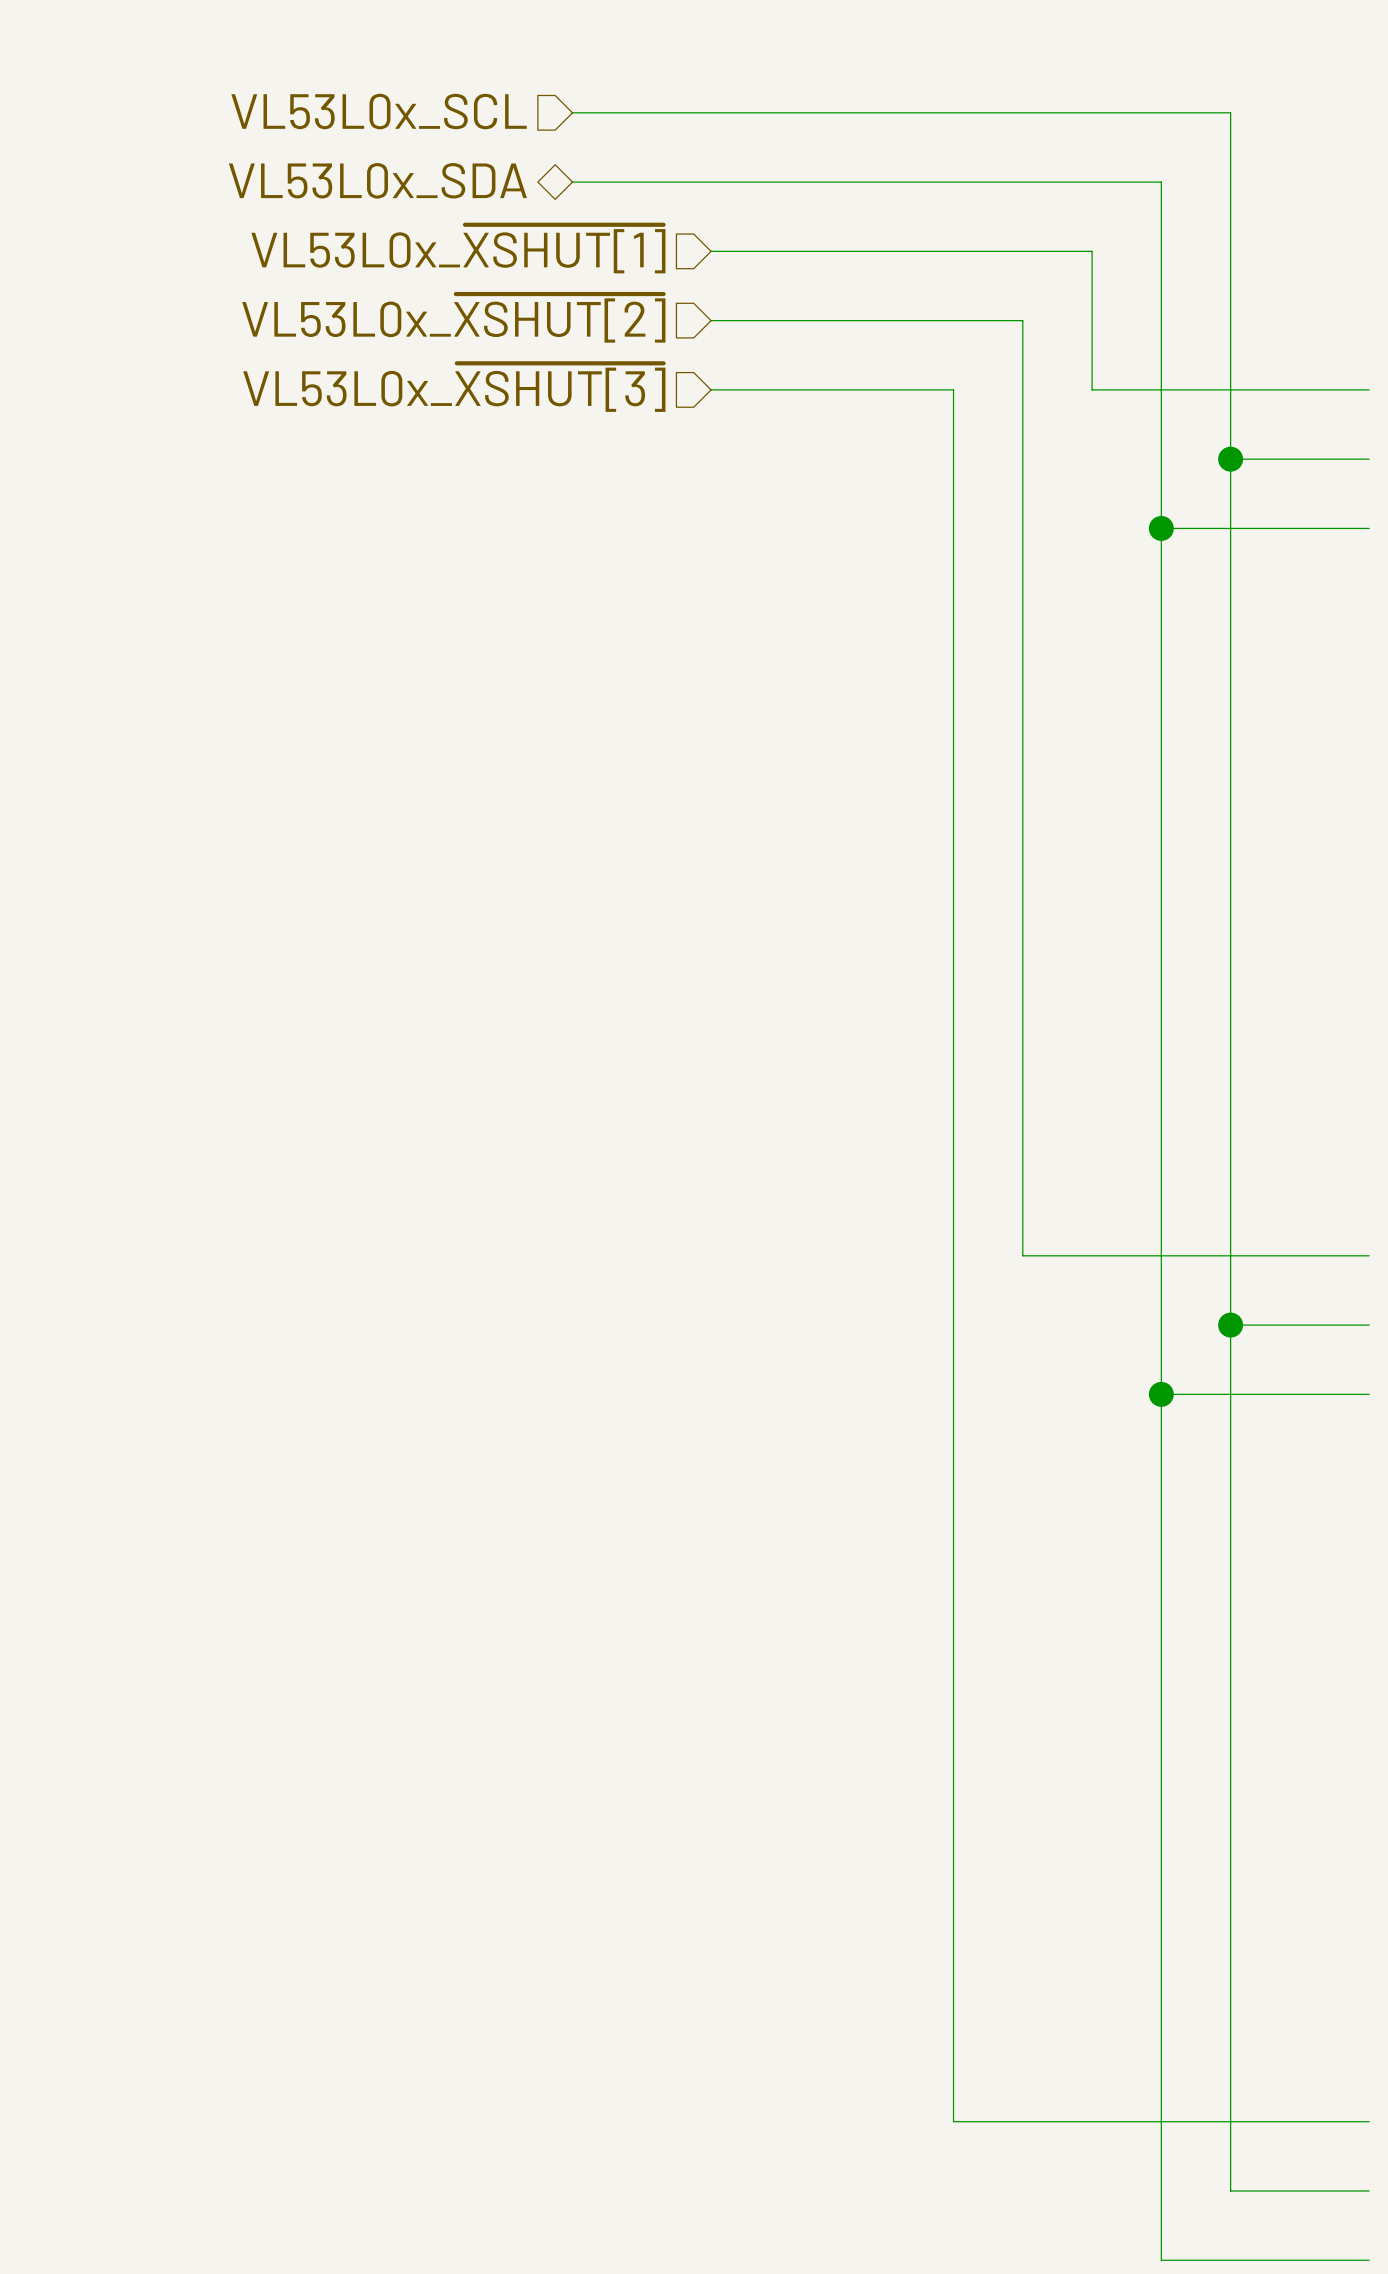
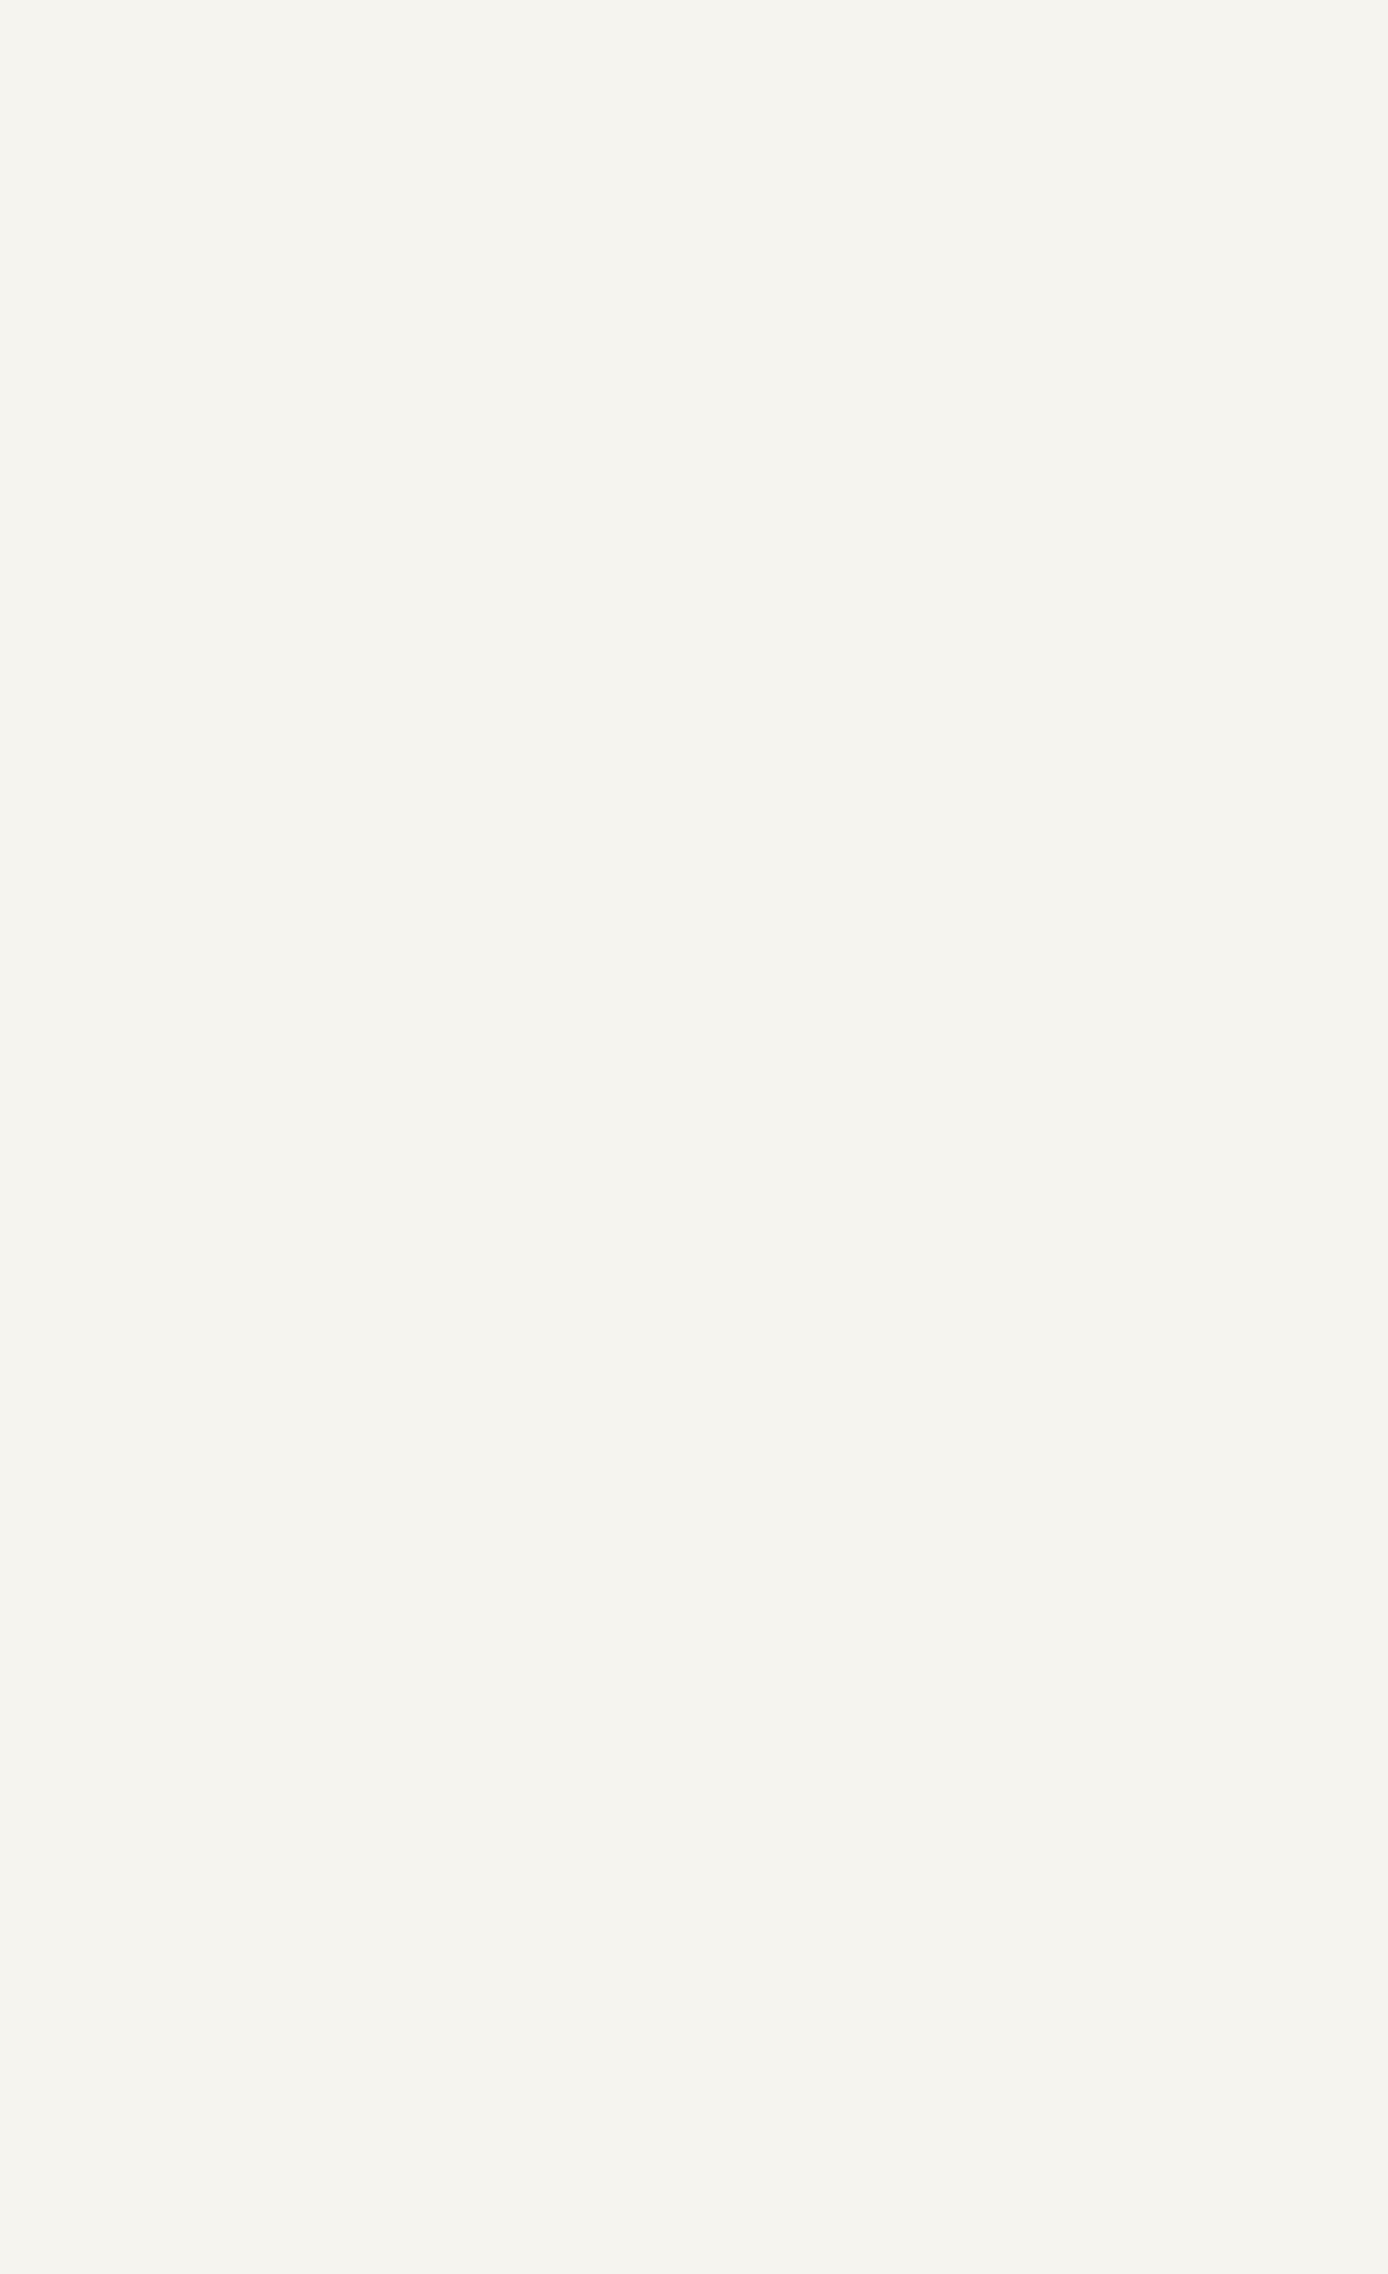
hierarchical label: VL53L0x_SCL (379, 111) -> none
wire: (572, 112) (1230, 112) (1230, 2190) (1369, 2190) -> none
hierarchical label: VL53L0x_SDA (377, 180) -> none
wire: (572, 182) (1161, 182) (1161, 2260) (1369, 2260) -> none
hierarchical label: VL53L0x_~{XSHUT[1]} (458, 249) -> none
wire: (711, 251) (1092, 251) (1092, 389) (1369, 389) -> none
hierarchical label: VL53L0x_~{XSHUT[2]} (453, 318) -> none
wire: (711, 320) (1022, 320) (1022, 1255) (1369, 1255) -> none
hierarchical label: VL53L0x_~{XSHUT[3]} (454, 387) -> none
wire: (711, 389) (953, 389) (953, 2121) (1369, 2121) -> none
wire: (1230, 459) (1369, 459) -> none
junction: (1230, 459) -> none
wire: (1161, 528) (1369, 528) -> none
junction: (1161, 528) -> none
wire: (1230, 1325) (1369, 1325) -> none
junction: (1230, 1325) -> none
wire: (1161, 1394) (1369, 1394) -> none
junction: (1161, 1394) -> none

